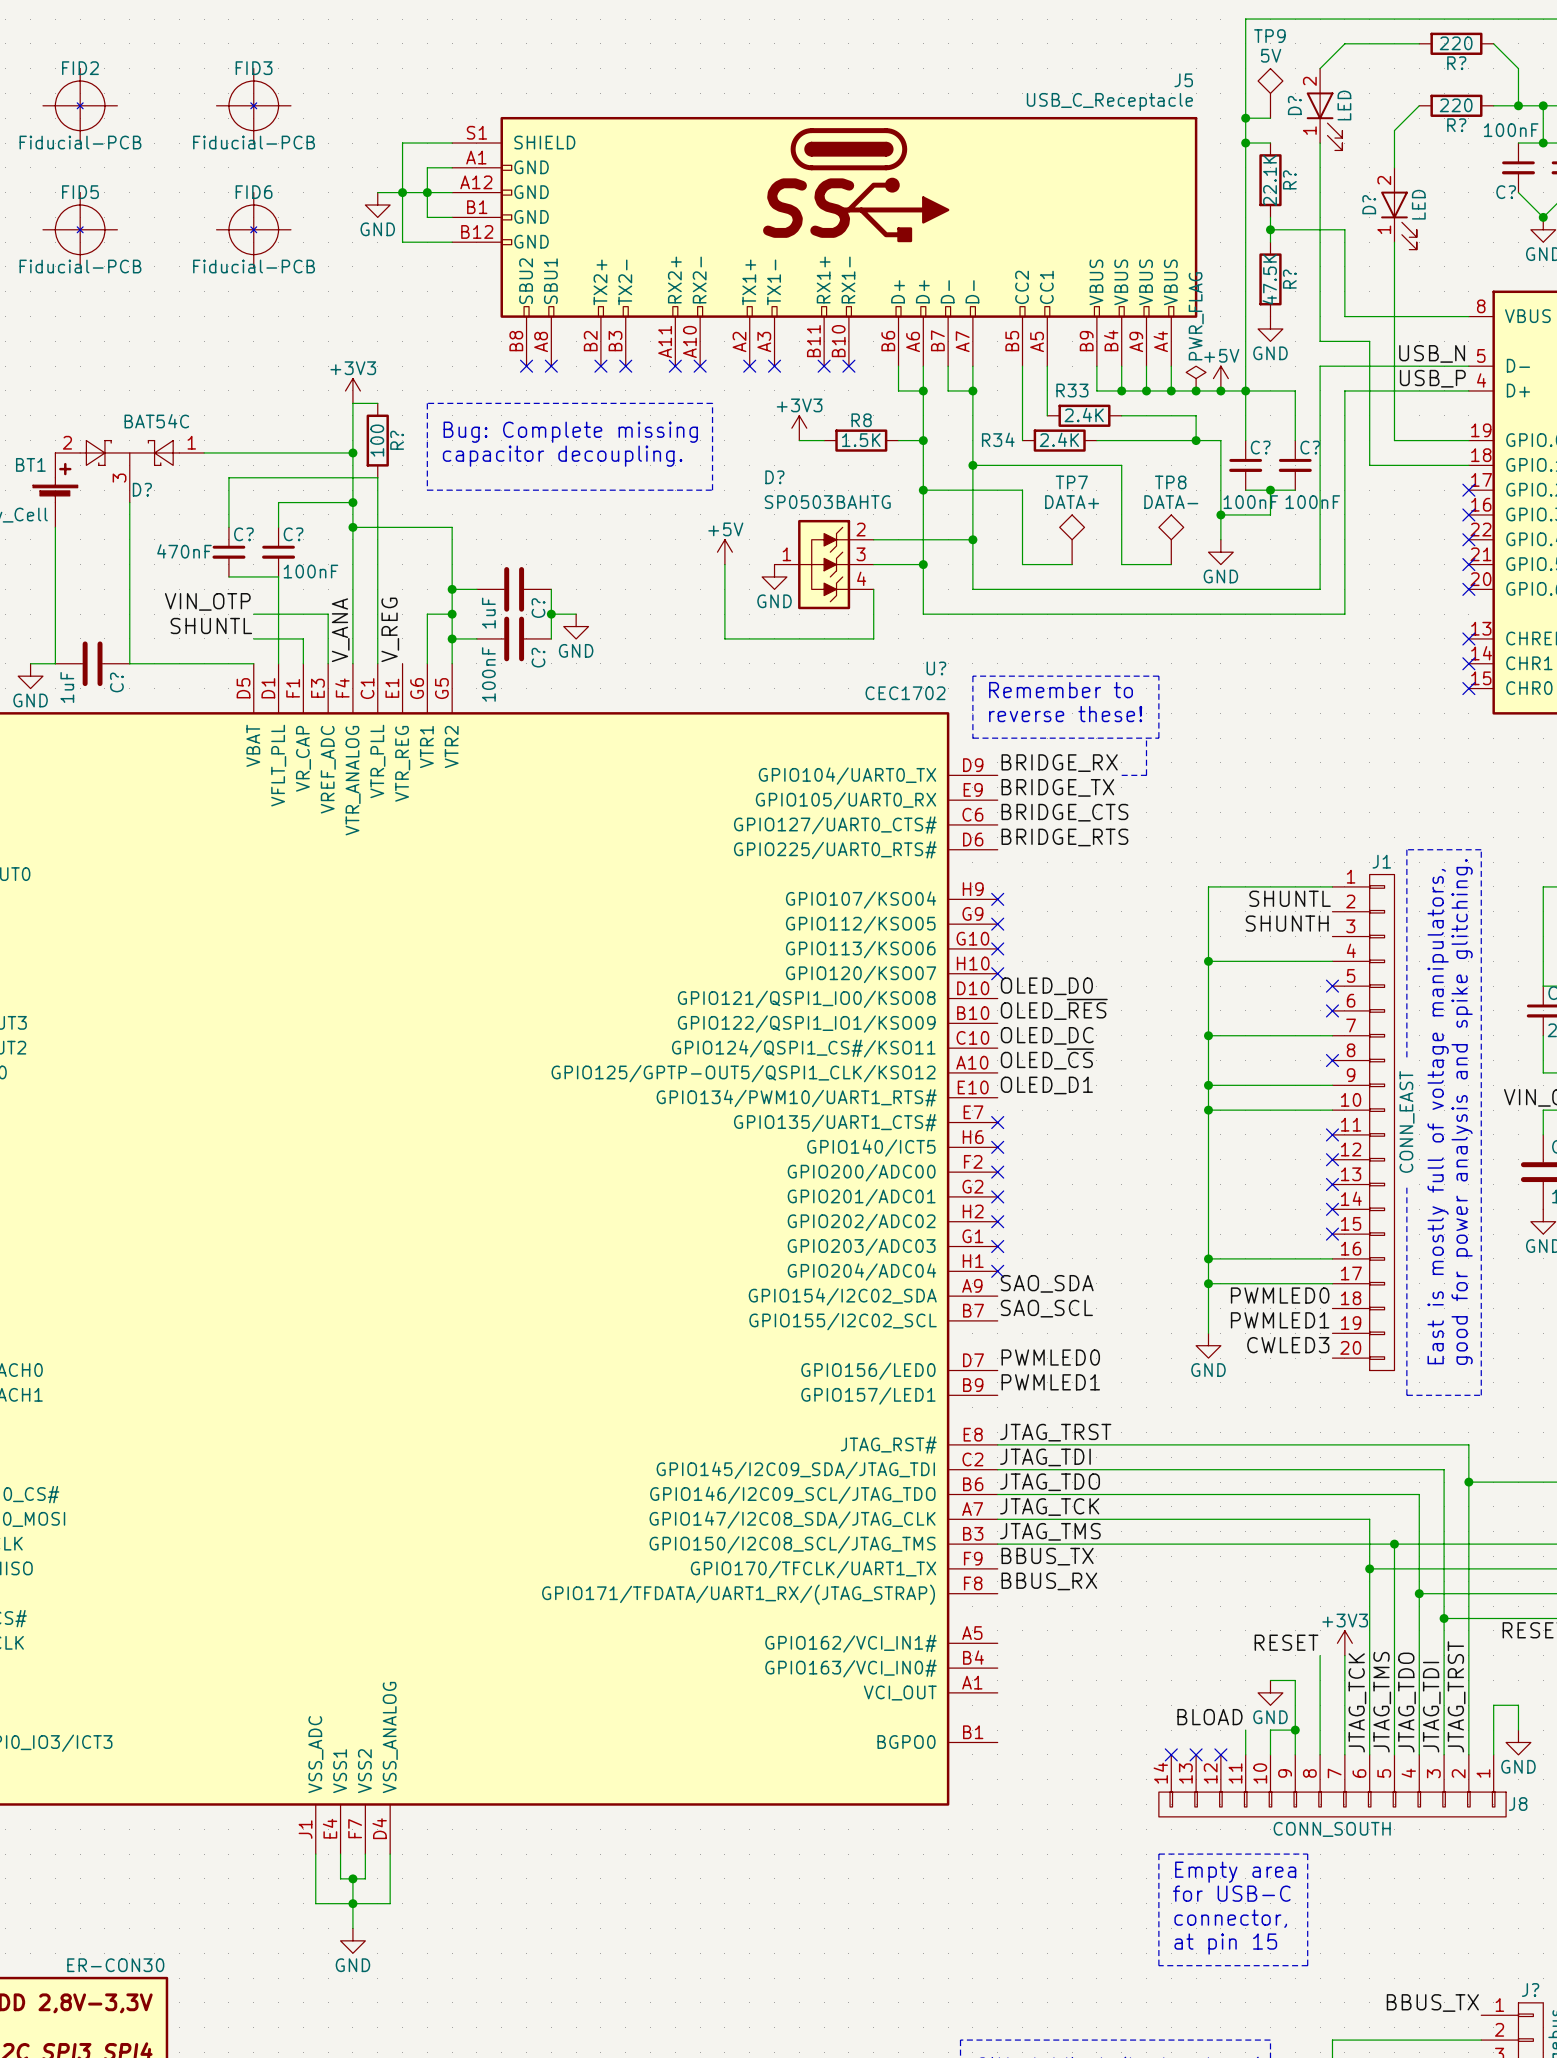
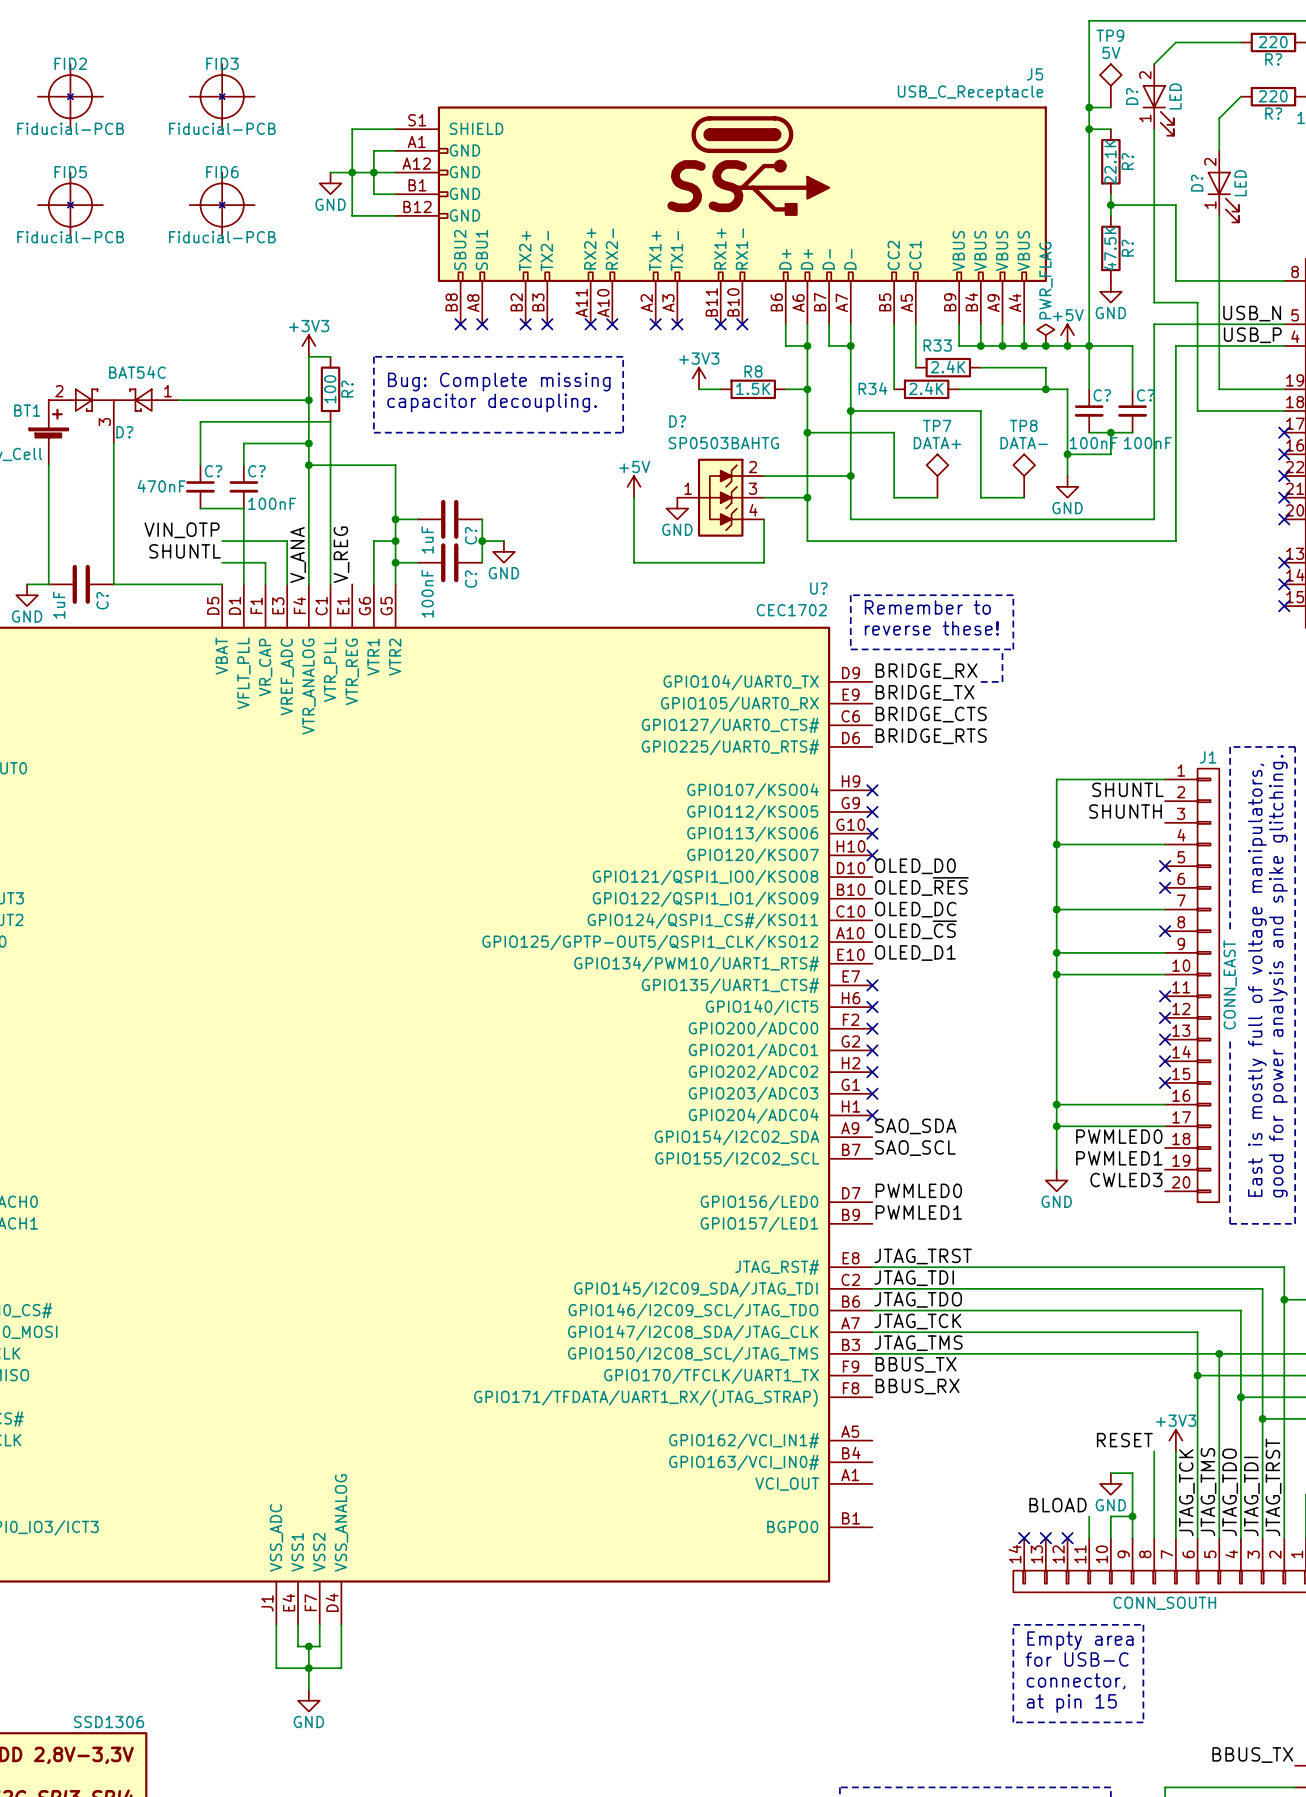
part value: ER-CON30 (115, 1965) -> SSD1306 (109, 1721)

